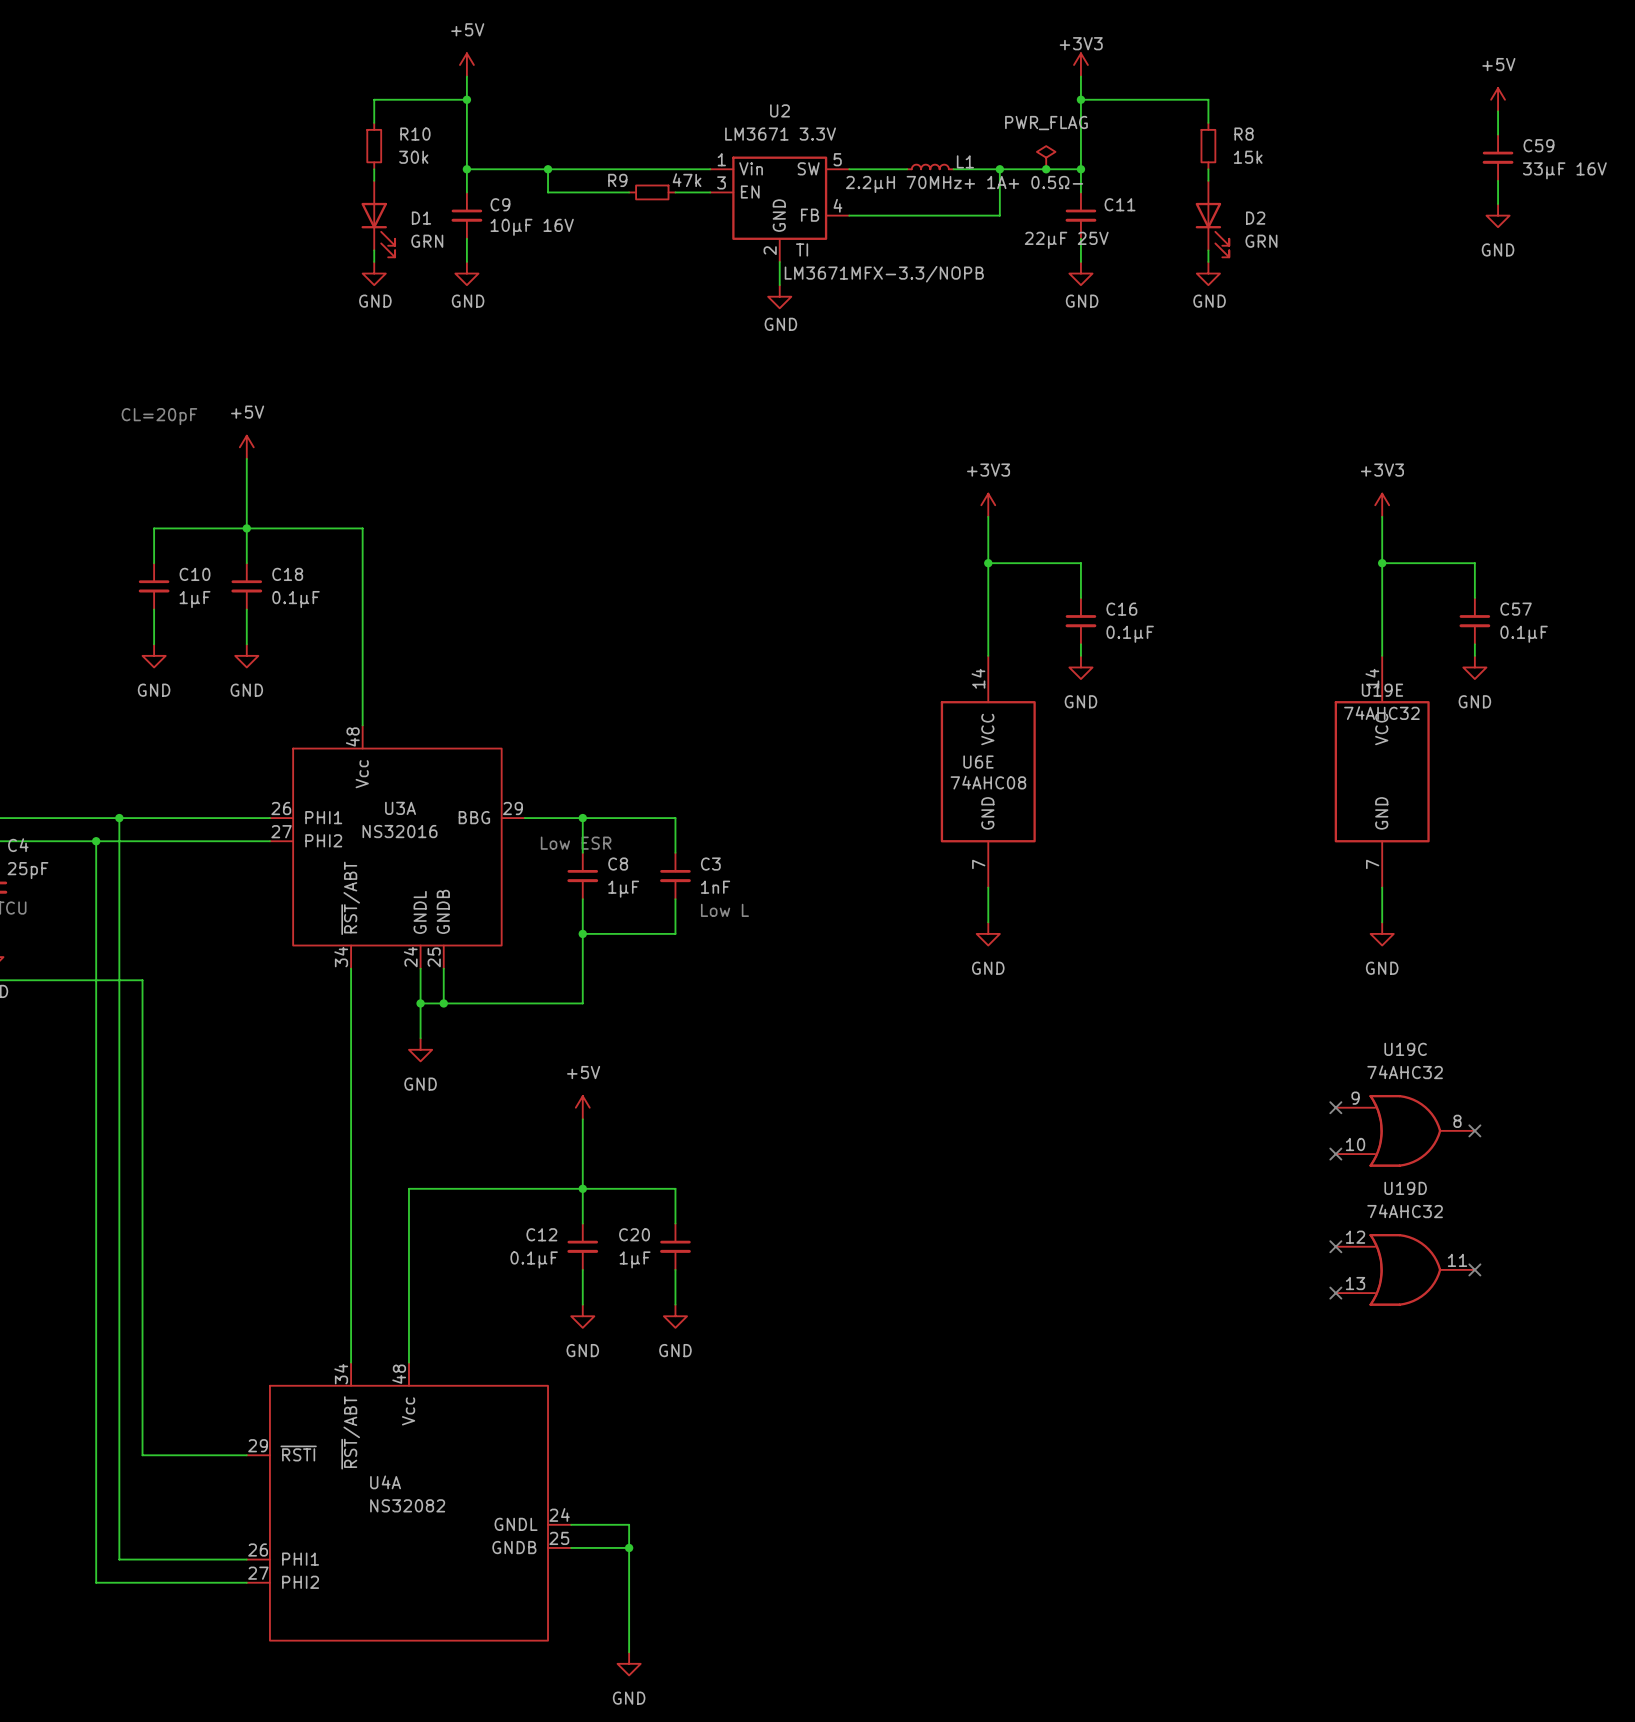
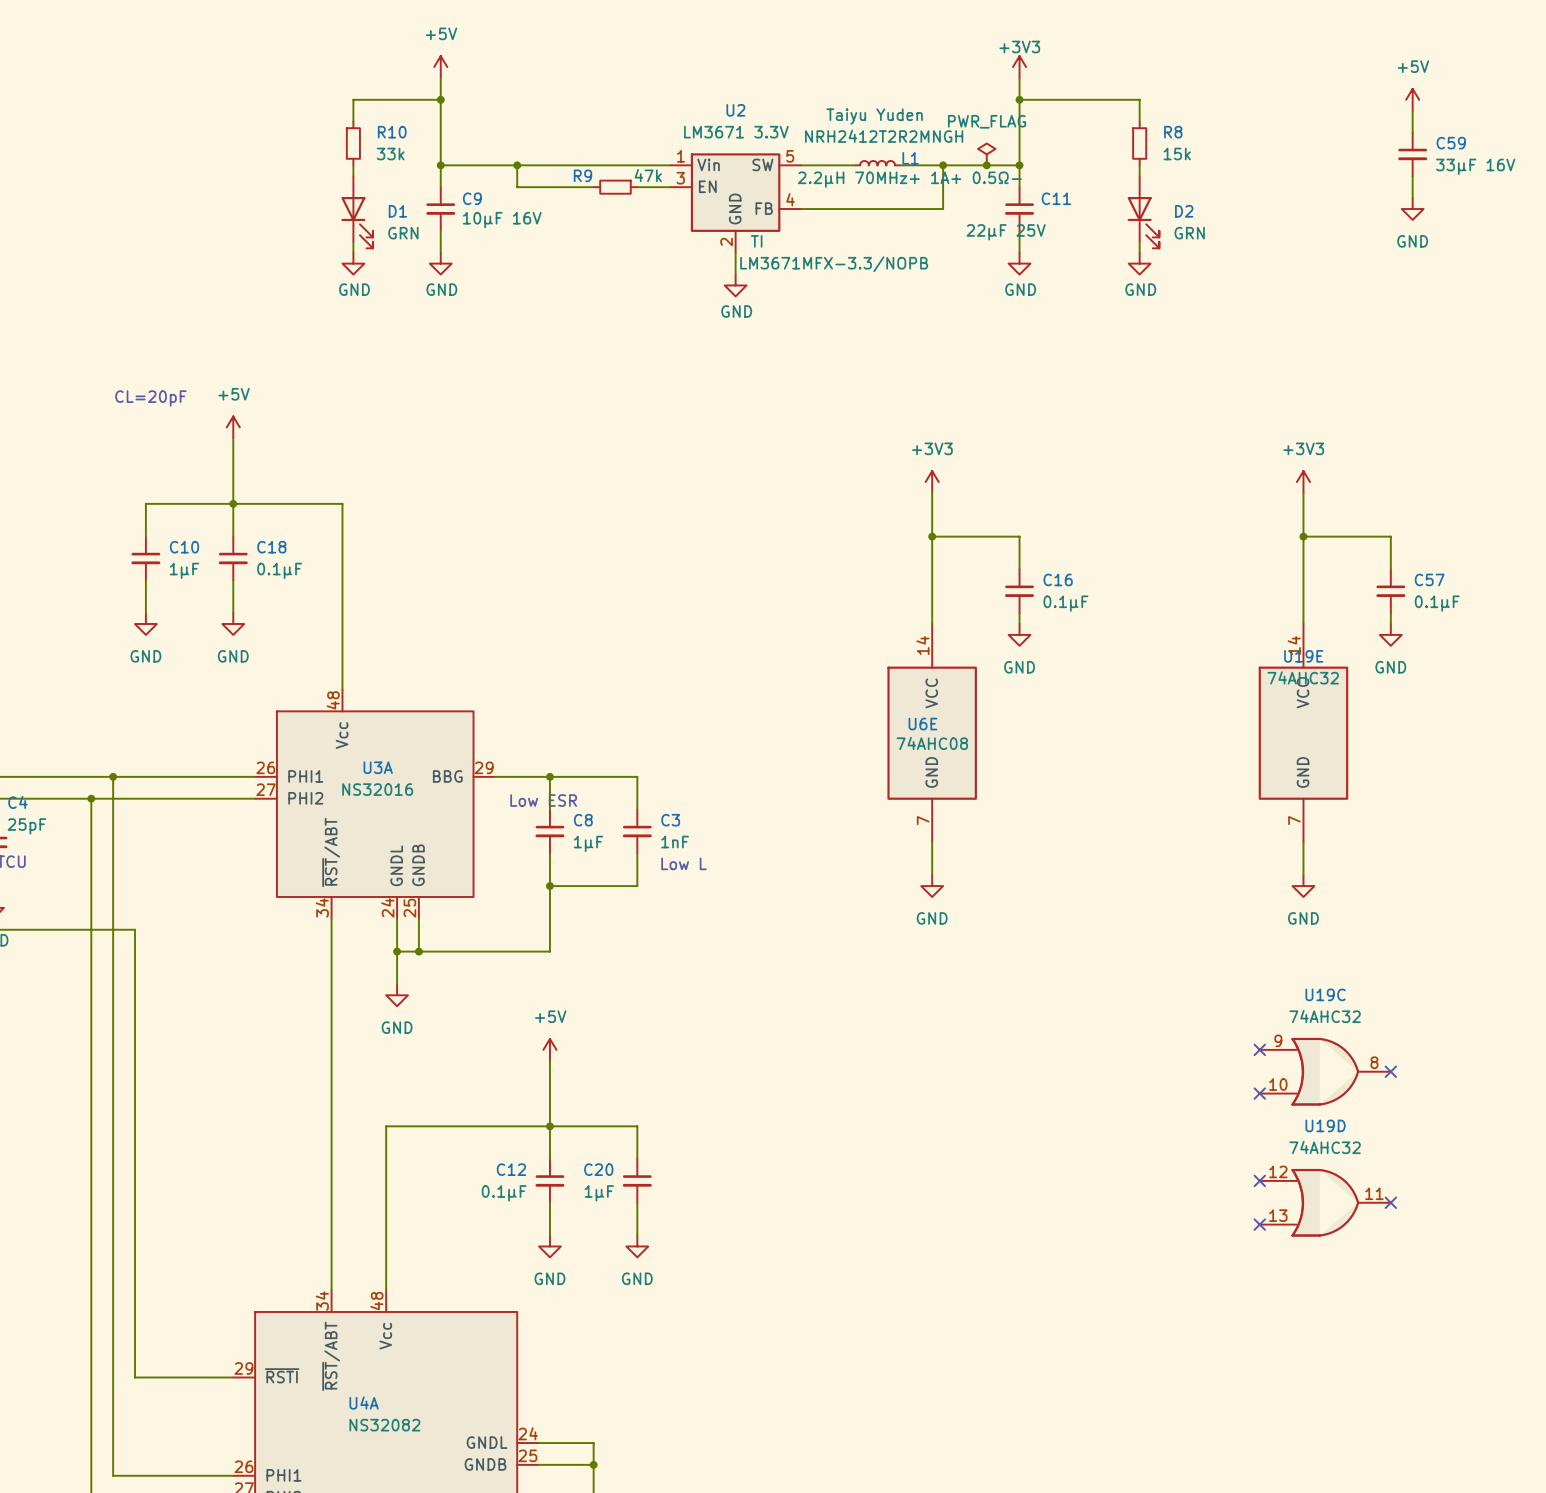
L1 text: none -> Taiyu Yuden (874, 116)
L1 text: none -> NRH2412T2R2MNGH (884, 136)
R10 value: 30k (413, 157) -> 33k (390, 154)

